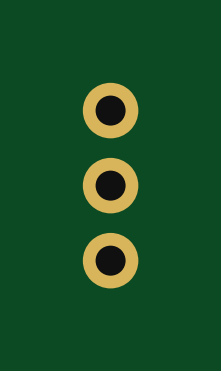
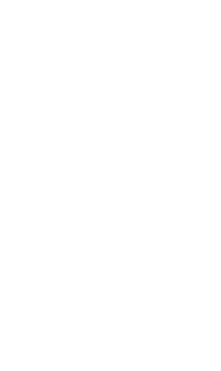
part: (110, 185) -> none

